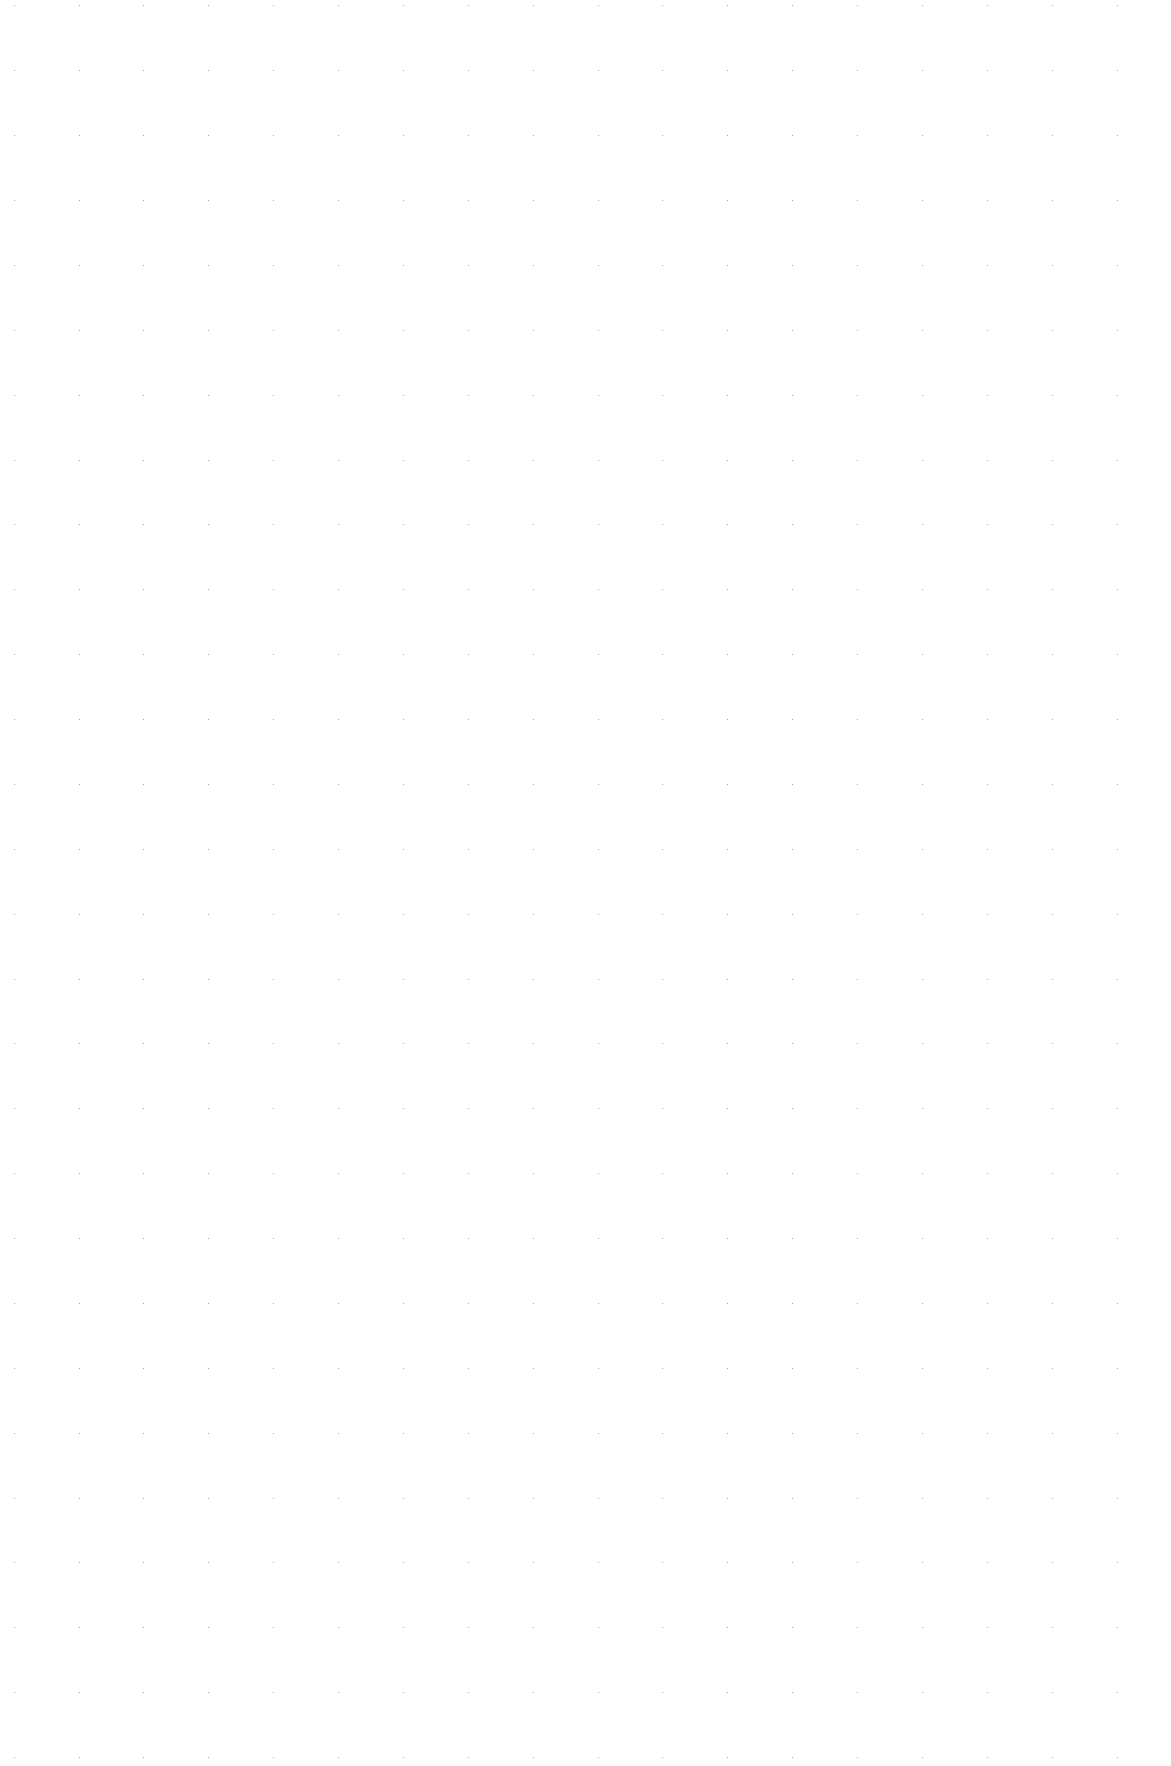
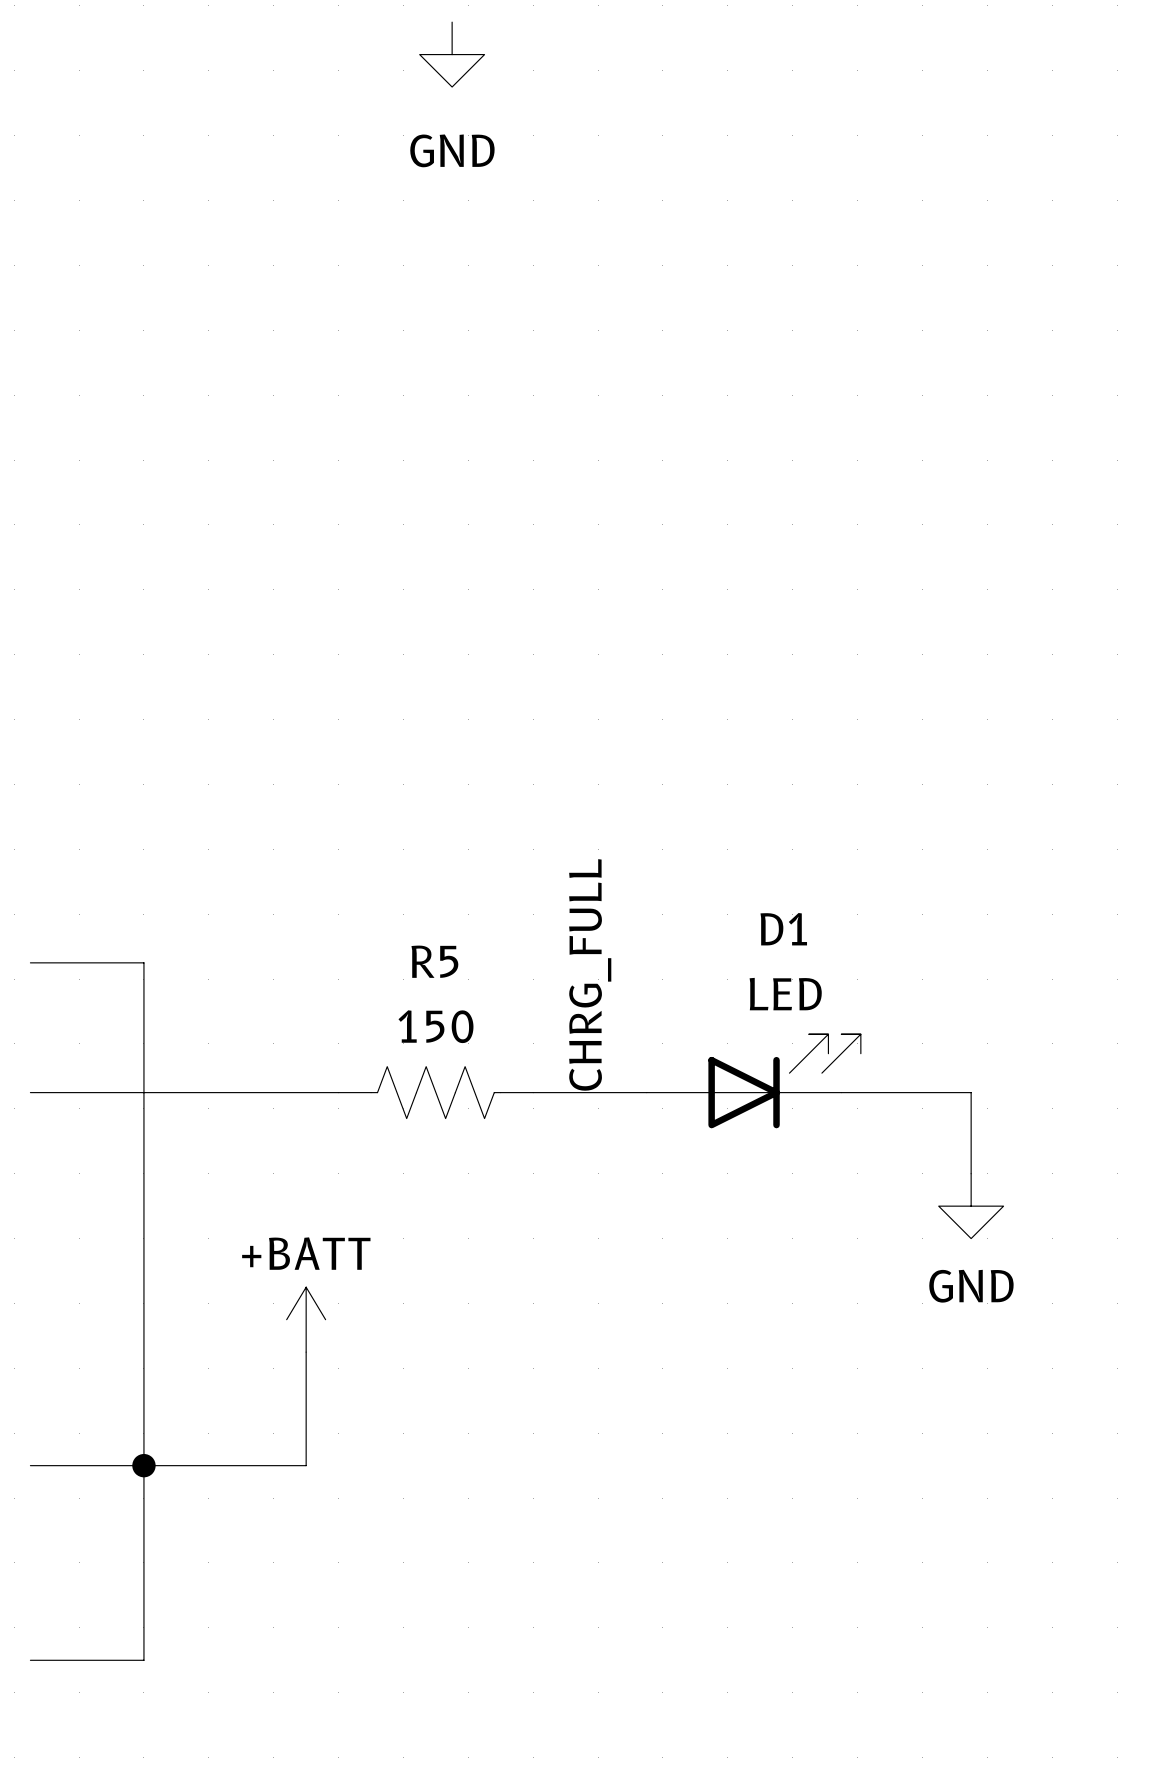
power symbol: none -> GND (452, 54)
wire: none -> (30, 962) (143, 962) (143, 1660) (30, 1660)
label: none -> CHRG_FULL (590, 974)
D1: none -> LED (753, 1081)
wire: none -> (30, 1092) (338, 1092)
R5: none -> 150 (435, 1092)
wire: none -> (533, 1092) (646, 1092)
wire: none -> (841, 1092) (971, 1092) (971, 1173)
power symbol: none -> GND (971, 1206)
power symbol: none -> +BATT (306, 1319)
wire: none -> (306, 1352) (306, 1465) (30, 1465)
junction: none -> (143, 1465)

